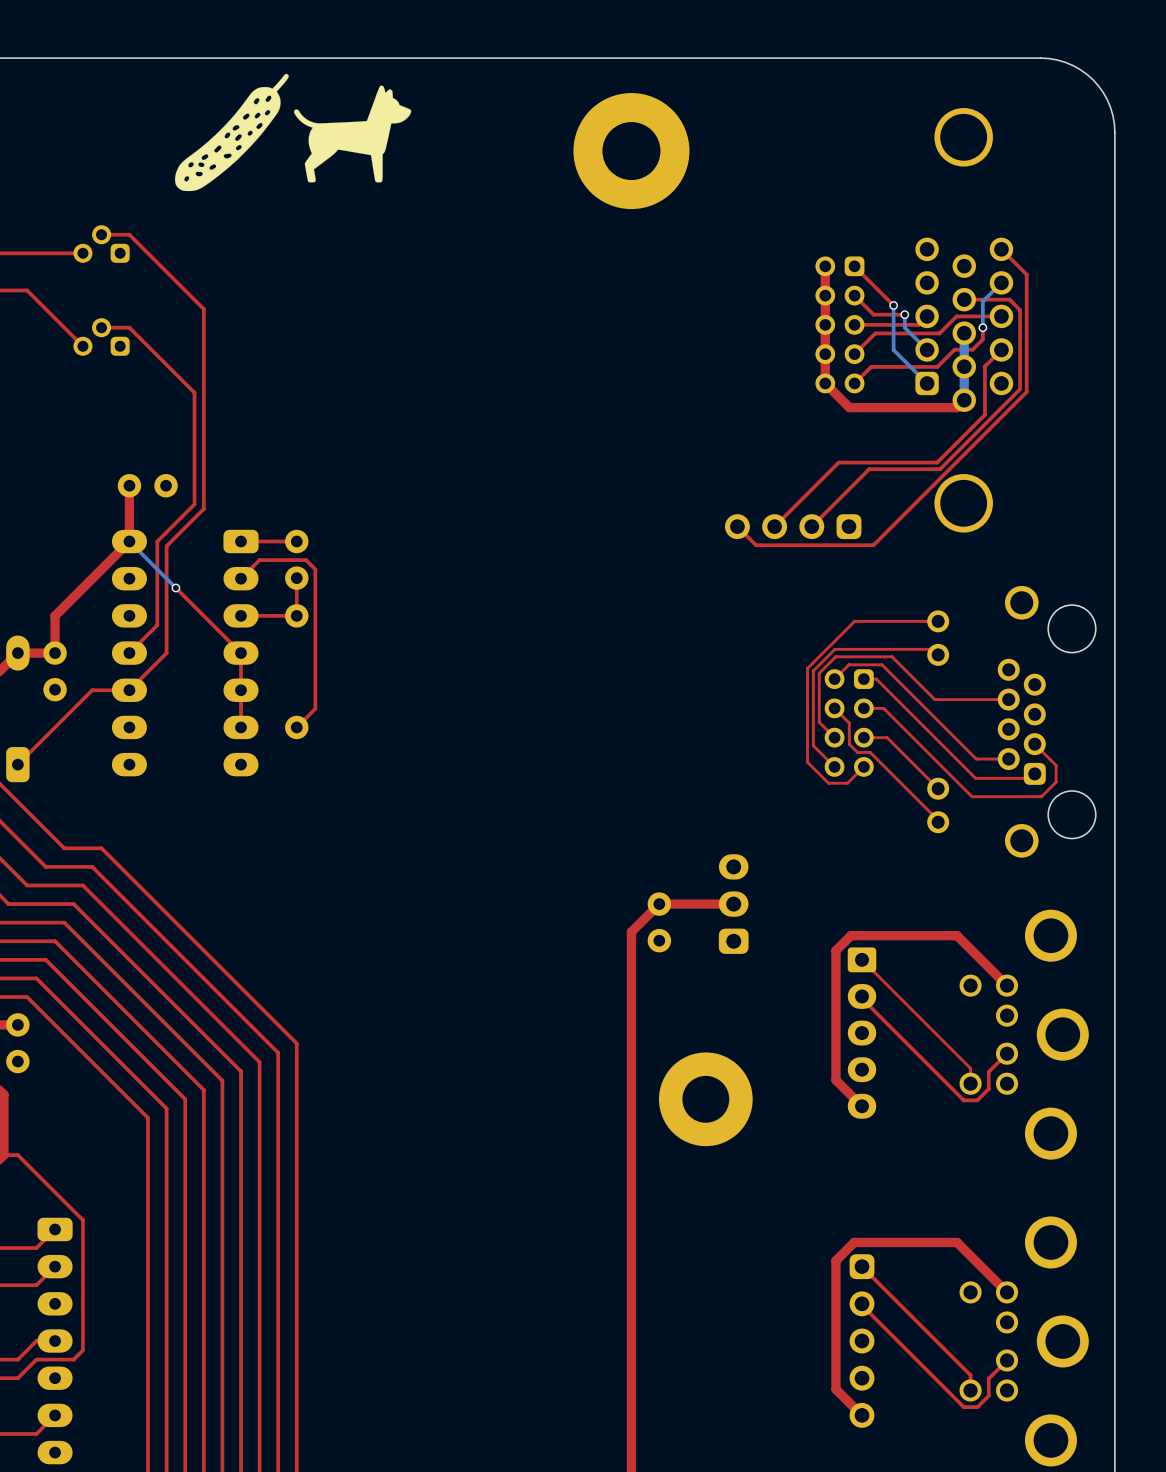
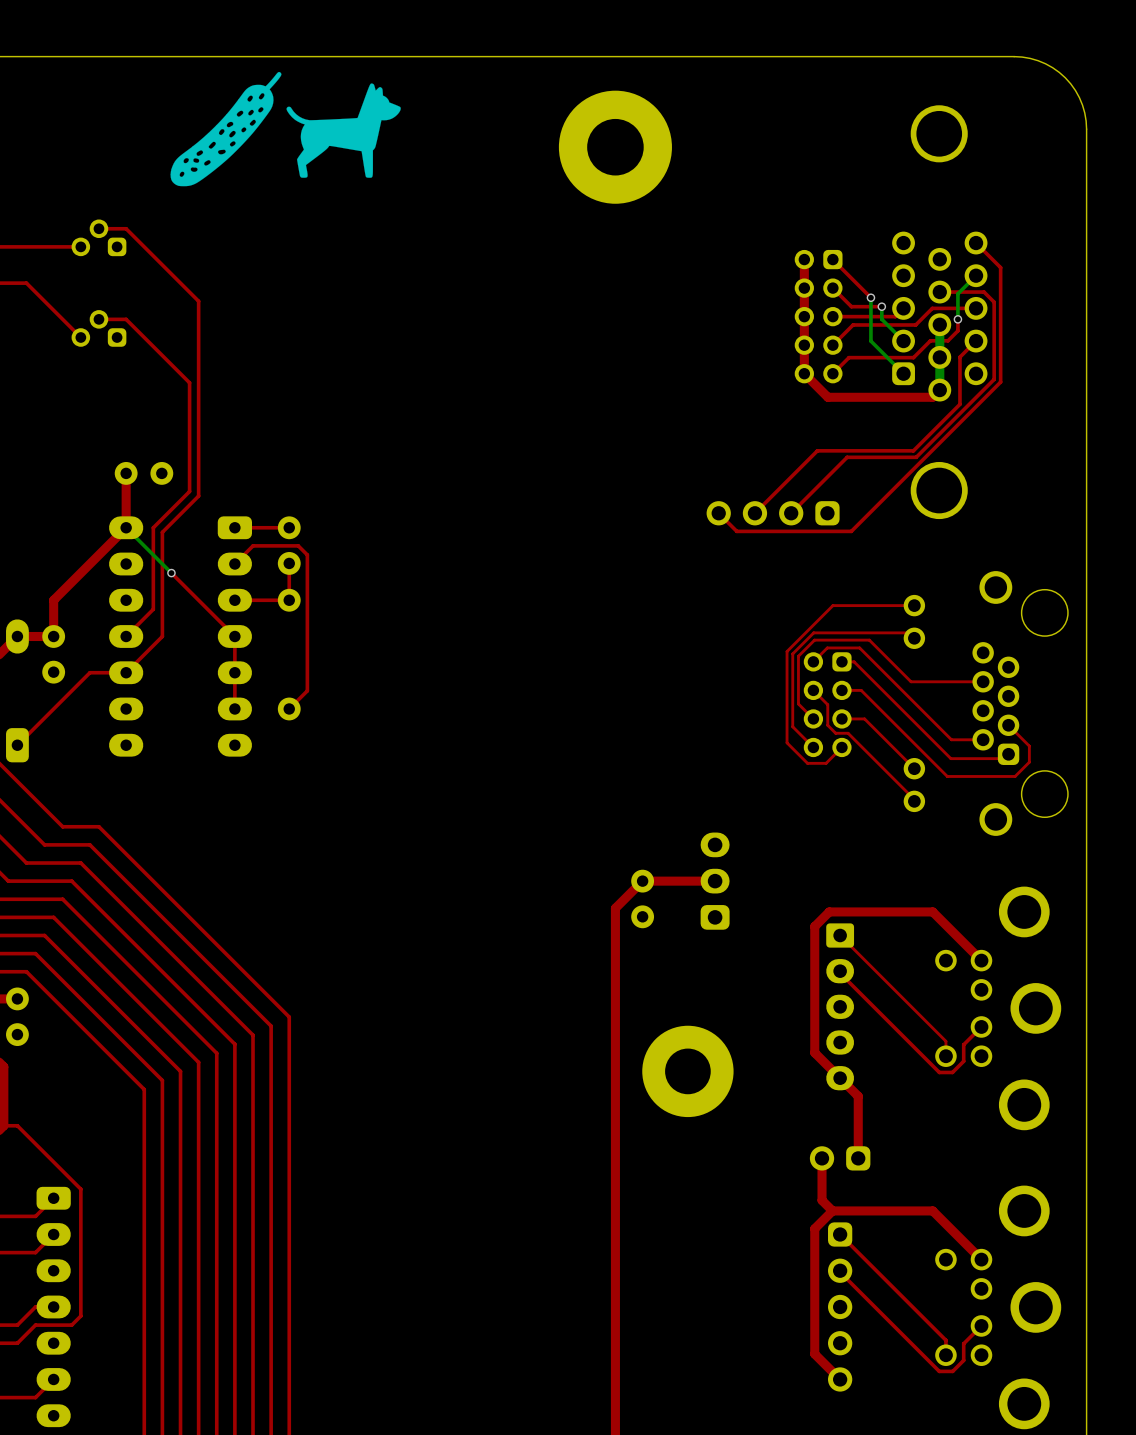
top track: none -> (840, 1078) (858, 1096) (858, 1158)
top track: none -> (822, 1158) (822, 1200) (832, 1210)
part: none -> (840, 1158)

